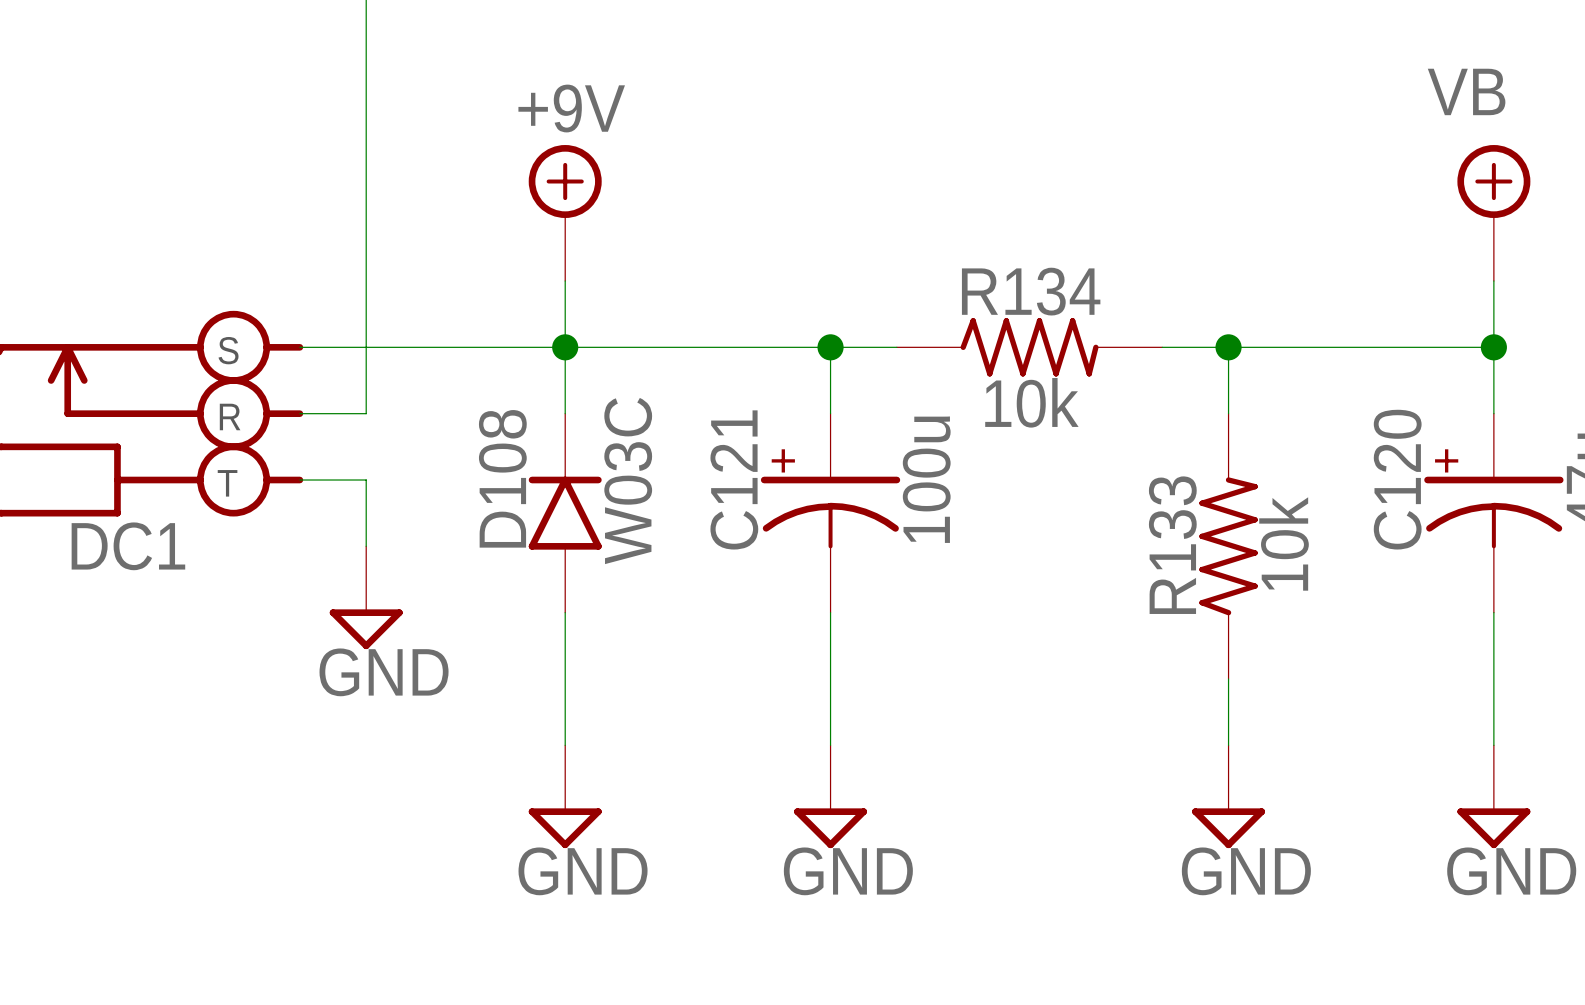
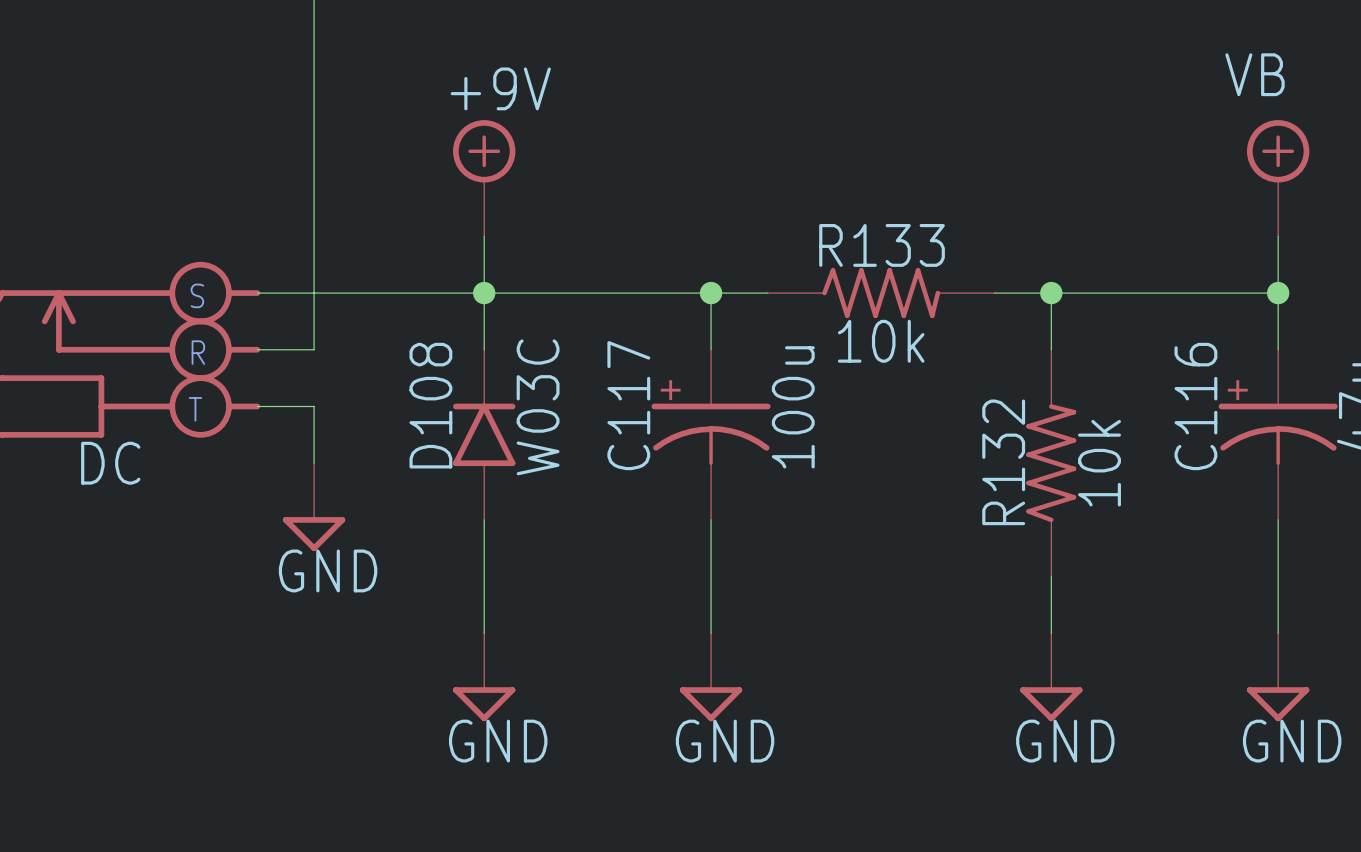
R134 name: R134 (1031, 291) -> R133 (882, 245)
C121 name: C121 (734, 479) -> C117 (628, 405)
C120 name: C120 (1397, 479) -> C116 (1195, 406)
R133 name: R133 (1172, 545) -> R132 (1003, 462)
DC1 name: DC1 (128, 546) -> DC (110, 463)

